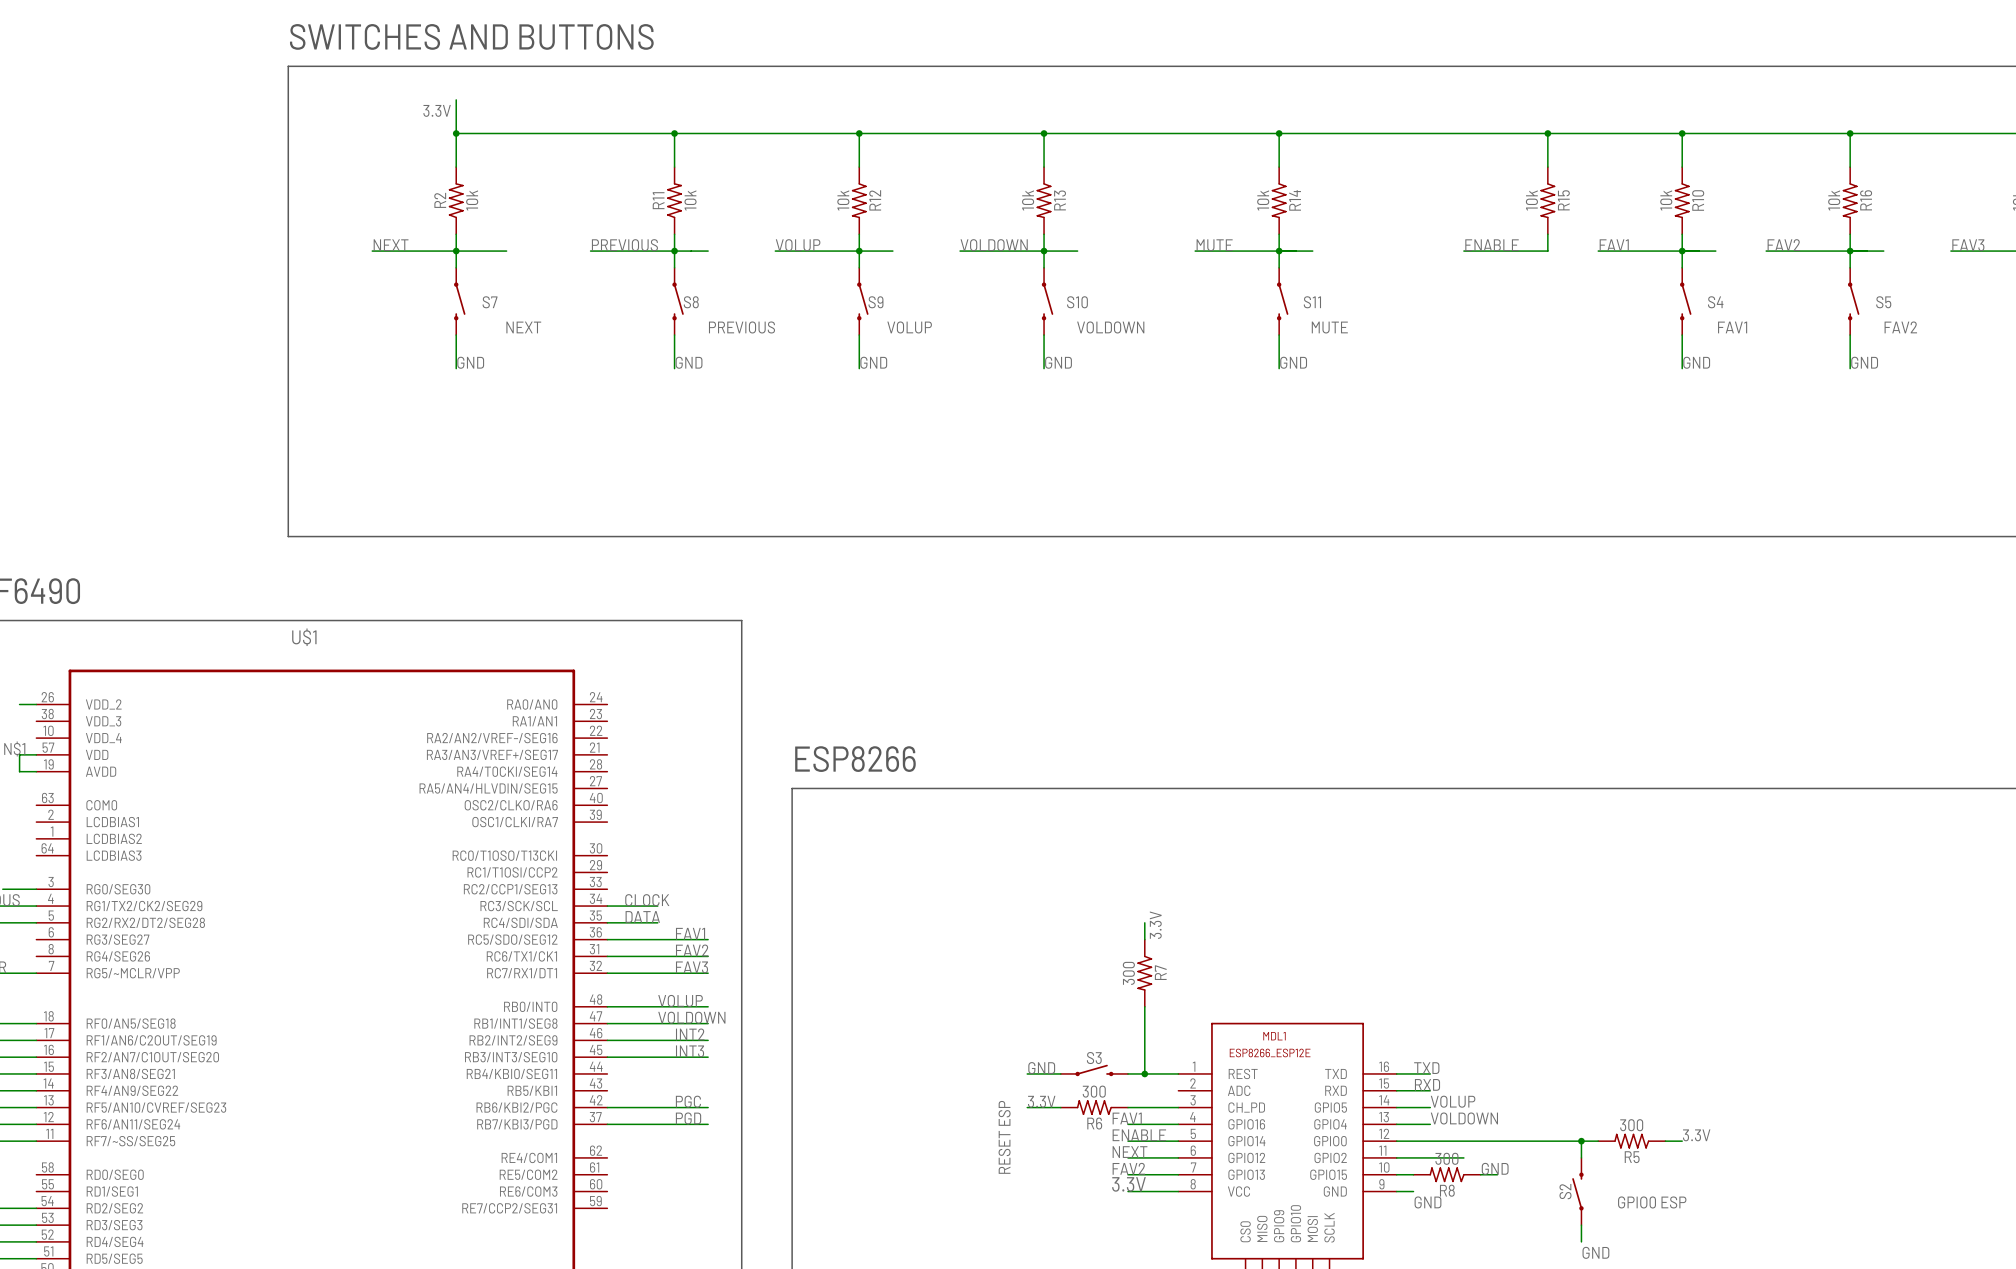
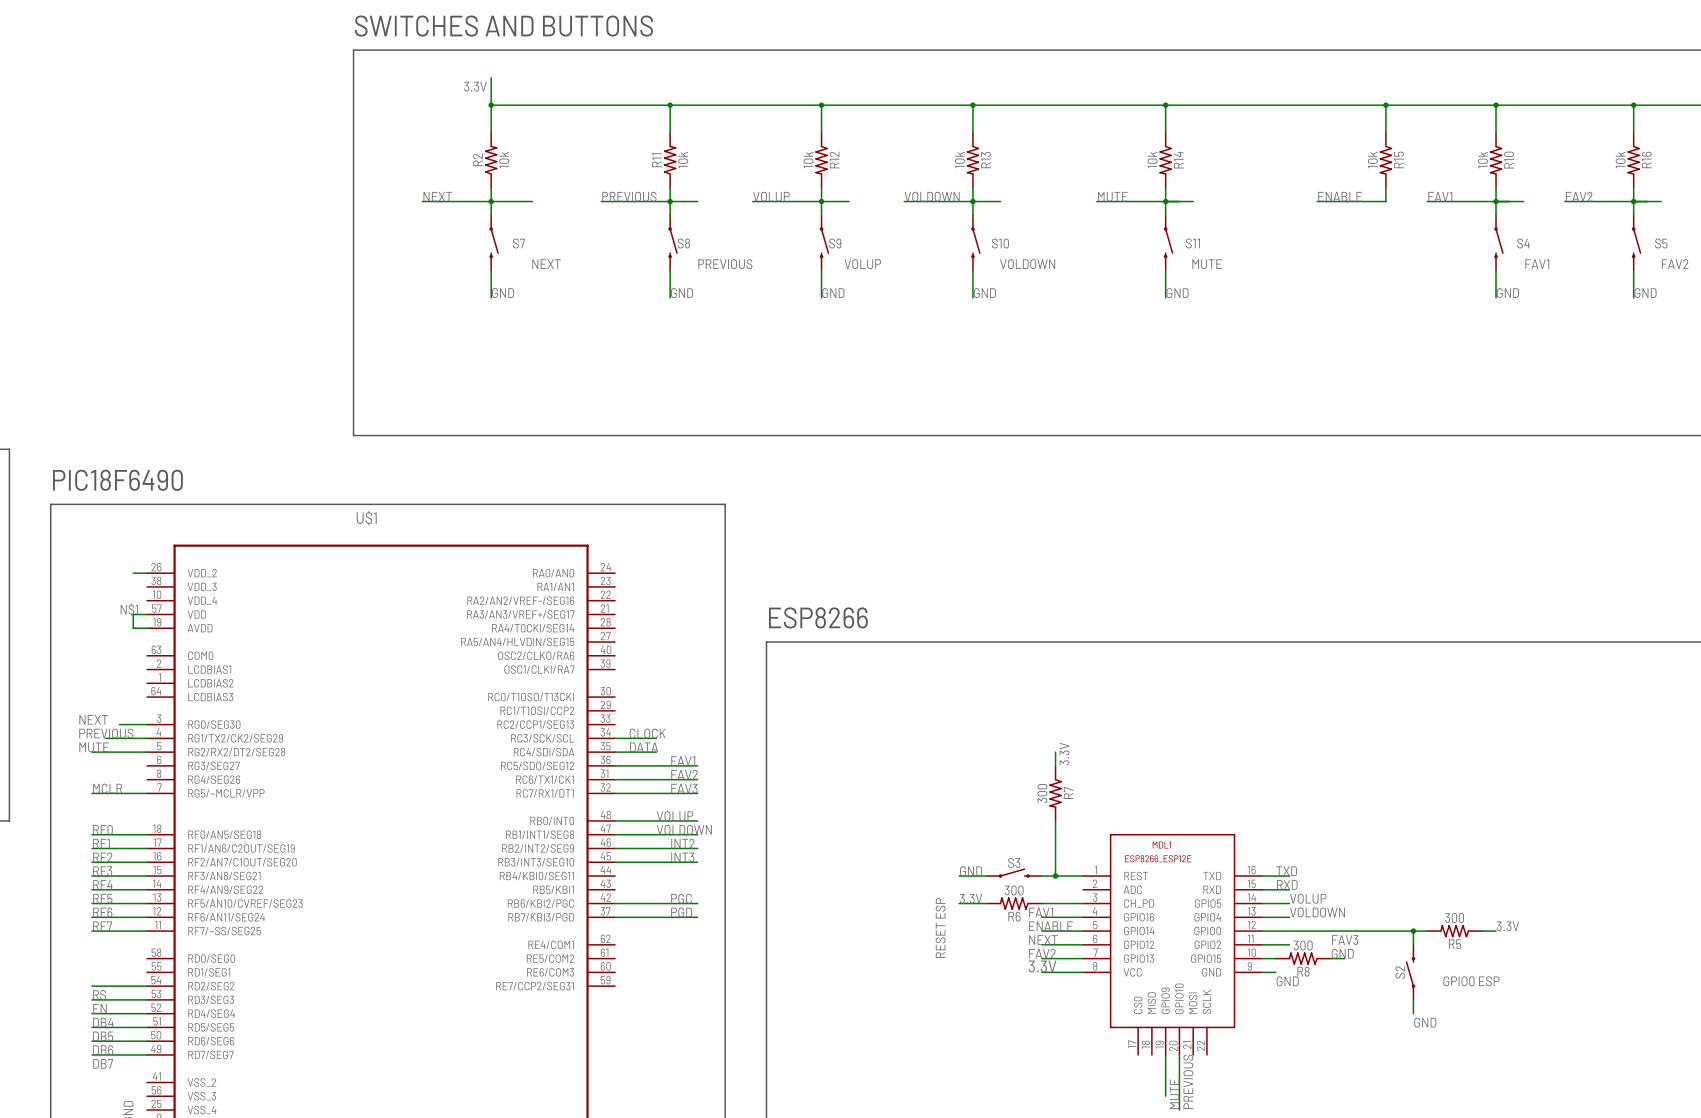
label: none -> FAV3 (1345, 940)
wire: (1430, 1157) (1463, 1157) -> none

